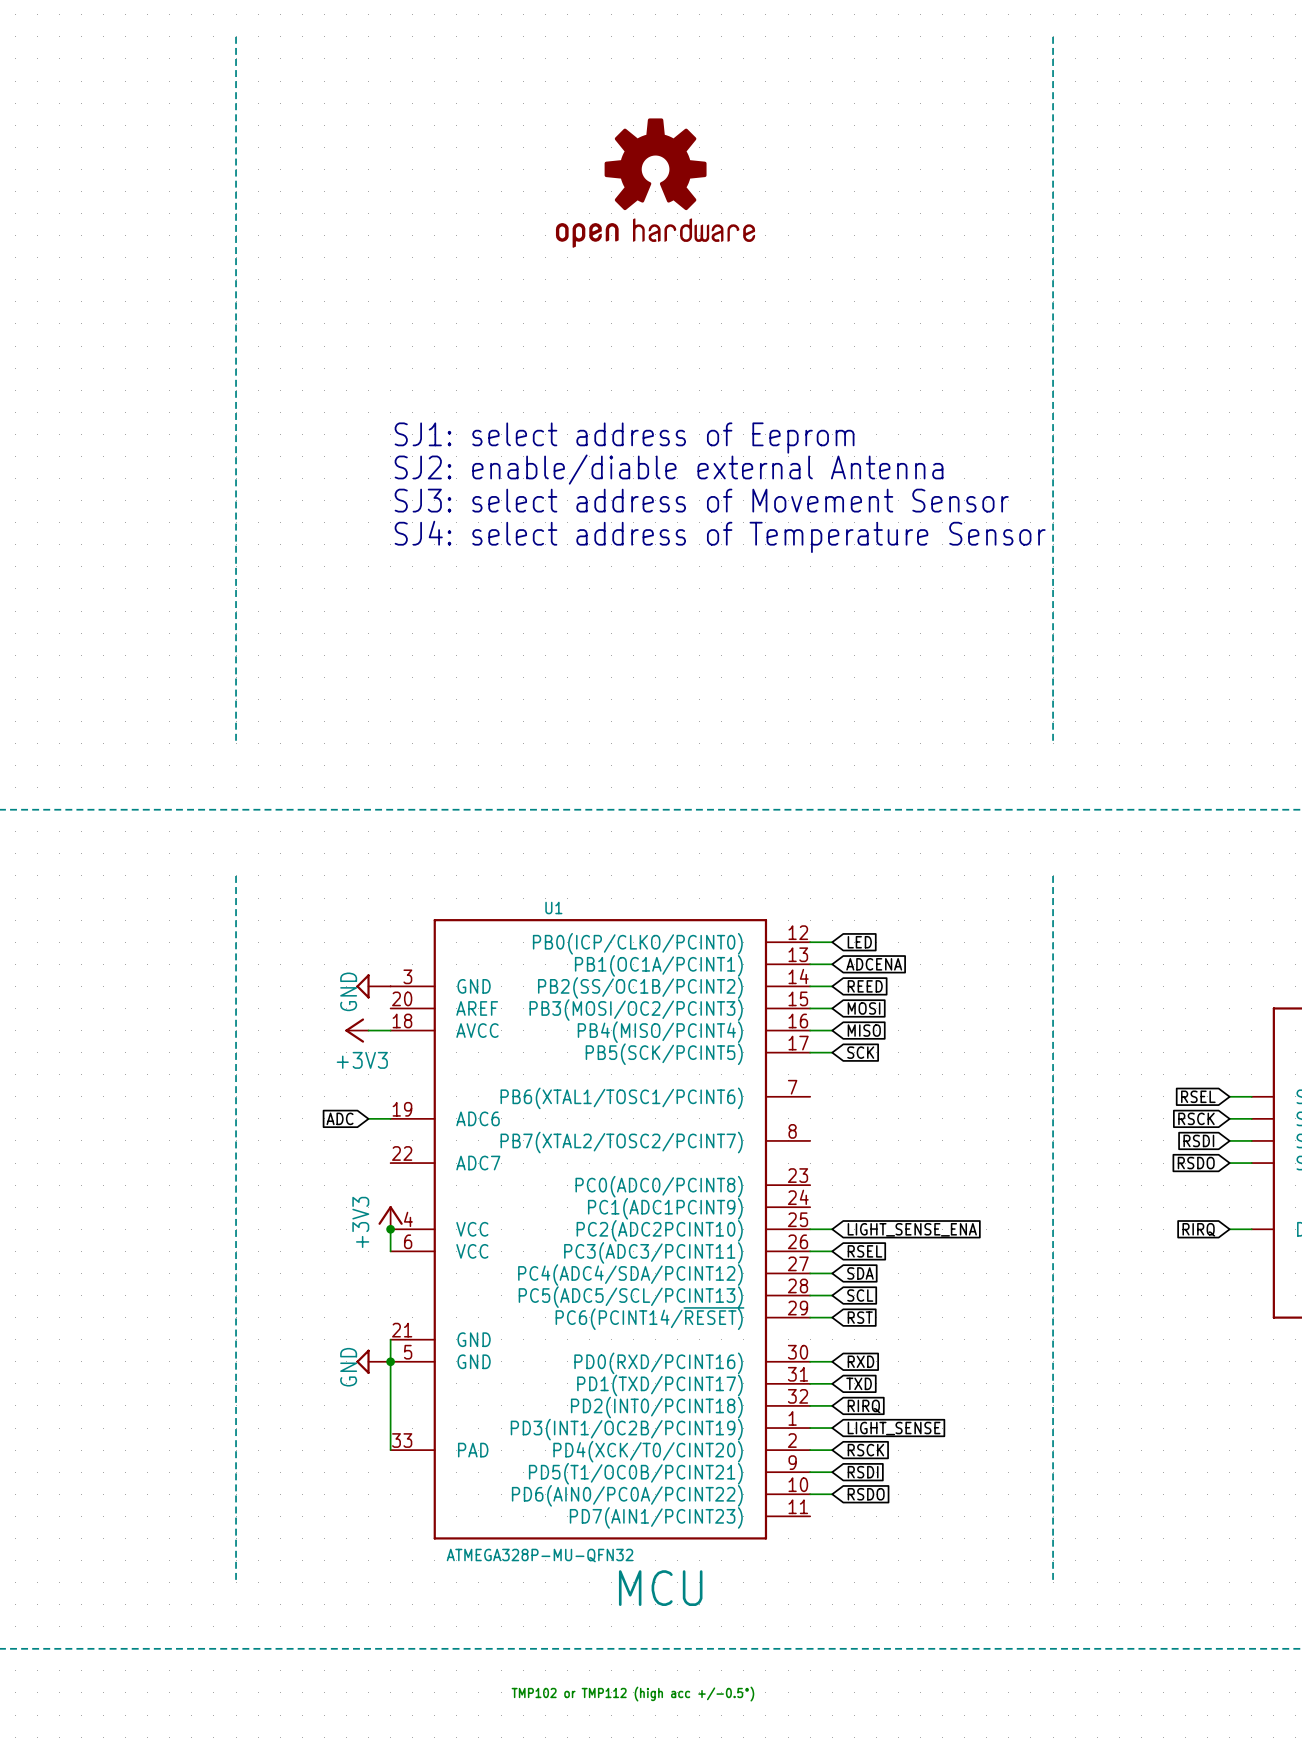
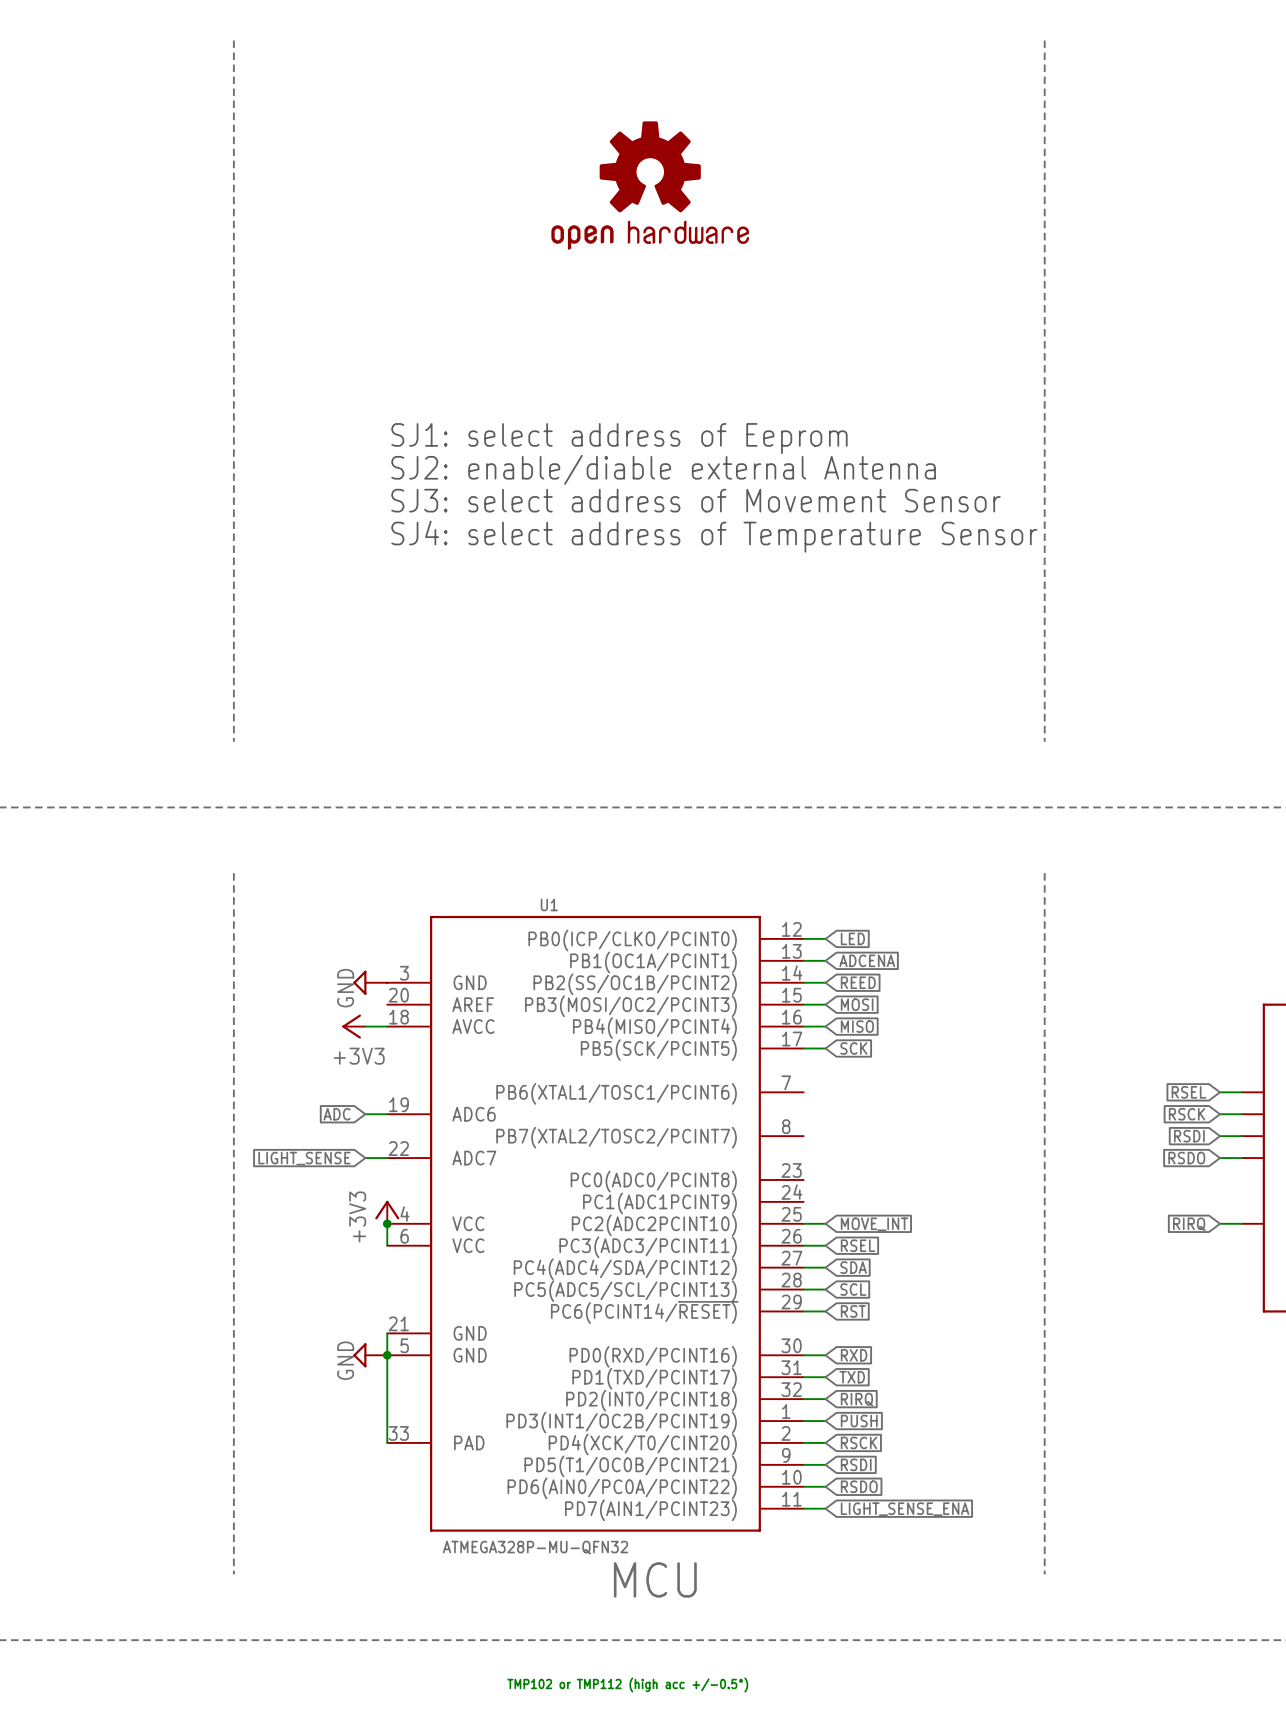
global label: none -> LIGHT_SENSE (304, 1158)
wire: none -> (365, 1158) (387, 1158)
global label: LIGHT_SENSE_ENA (912, 1229) -> MOVE_INT (874, 1224)
global label: LIGHT_SENSE (894, 1428) -> PUSH (859, 1421)
wire: none -> (803, 1508) (825, 1508)
global label: none -> LIGHT_SENSE_ENA (905, 1509)

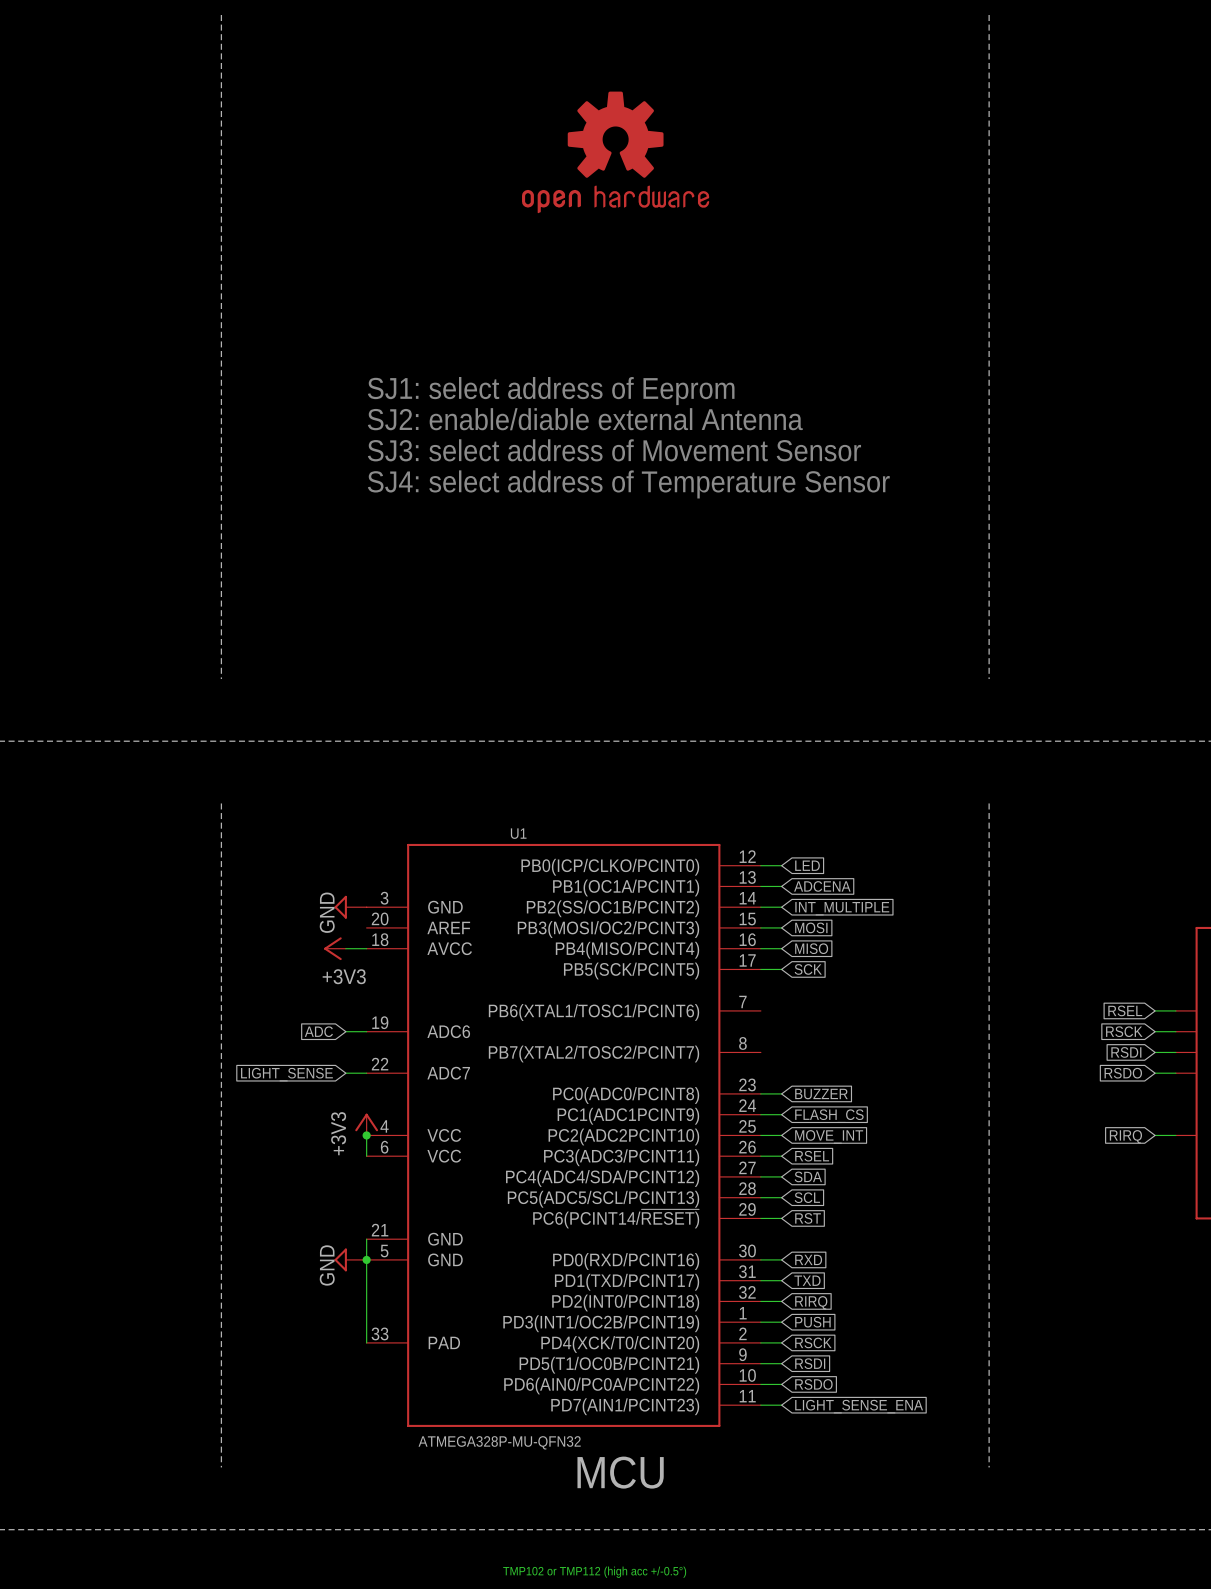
global label: REED (858, 982) -> INT_MULTIPLE (842, 908)
wire: none -> (760, 1093) (781, 1093)
global label: none -> BUZZER (821, 1094)
wire: none -> (760, 1114) (781, 1114)
global label: none -> FLASH_CS (829, 1116)

